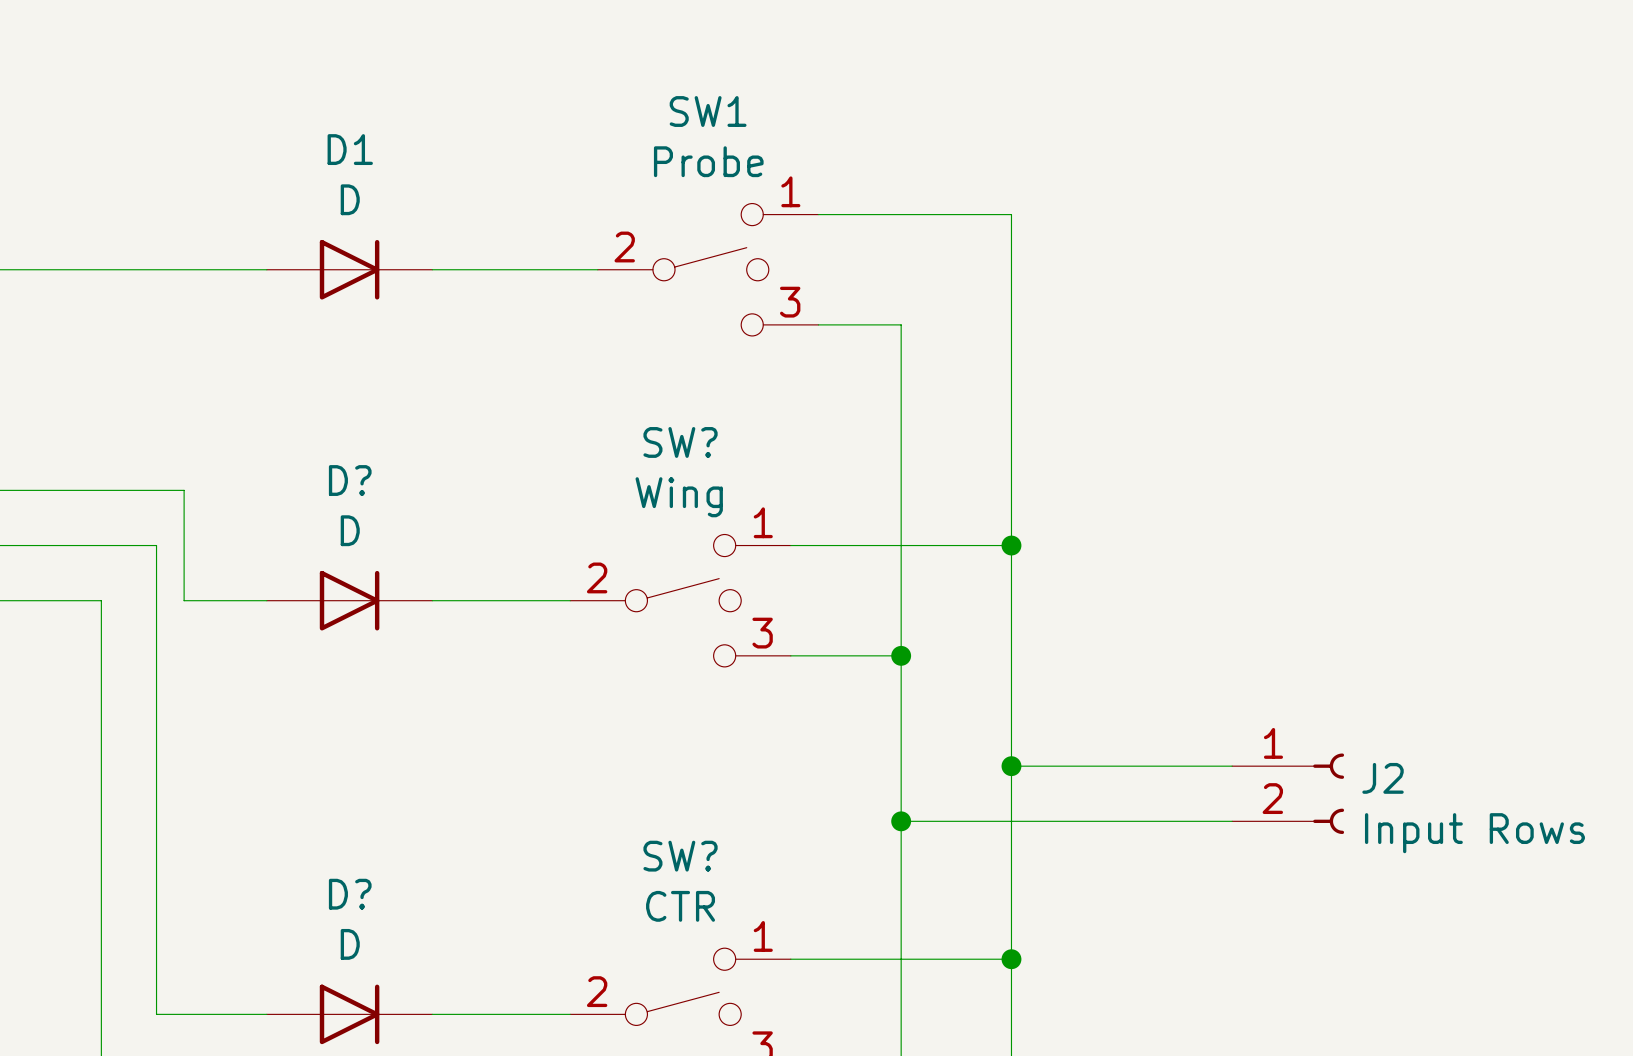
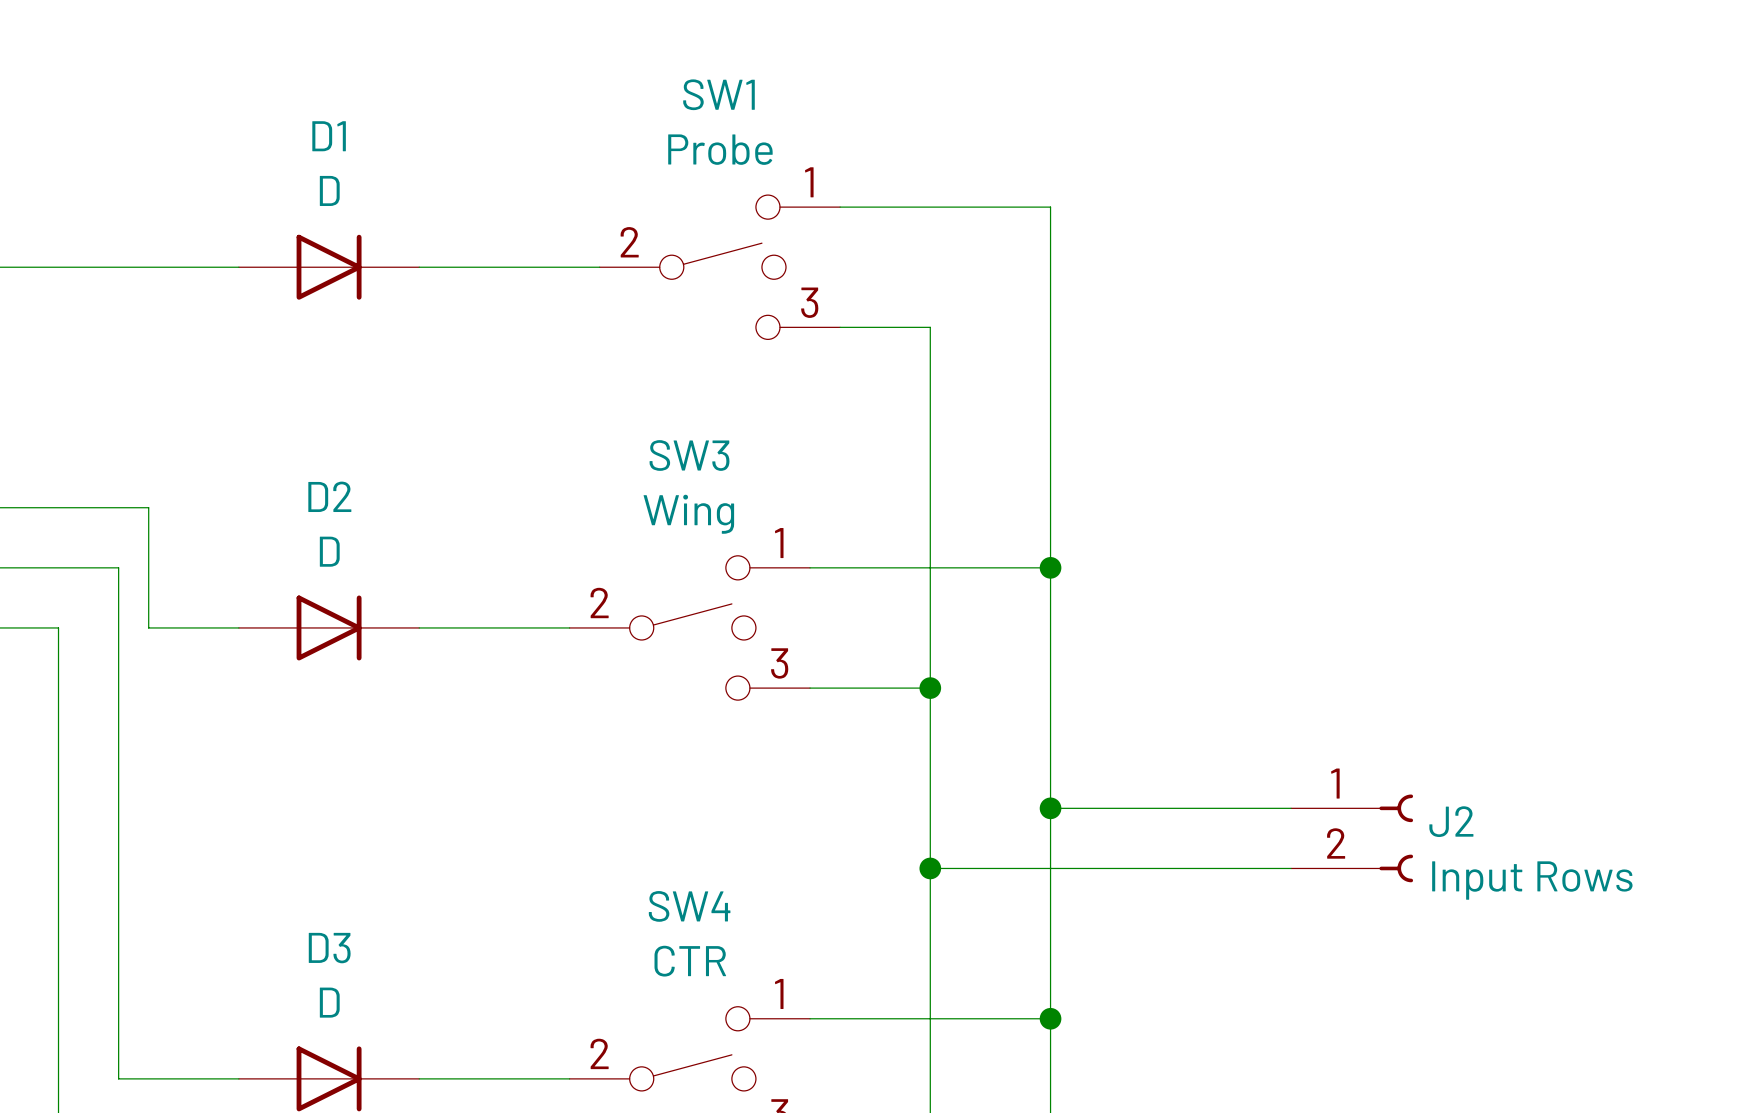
SW? name: SW? (680, 442) -> SW3 (689, 455)
D? name: D? (350, 480) -> D2 (329, 496)
SW? name: SW? (680, 856) -> SW4 (689, 906)
D? name: D? (350, 894) -> D3 (329, 948)

